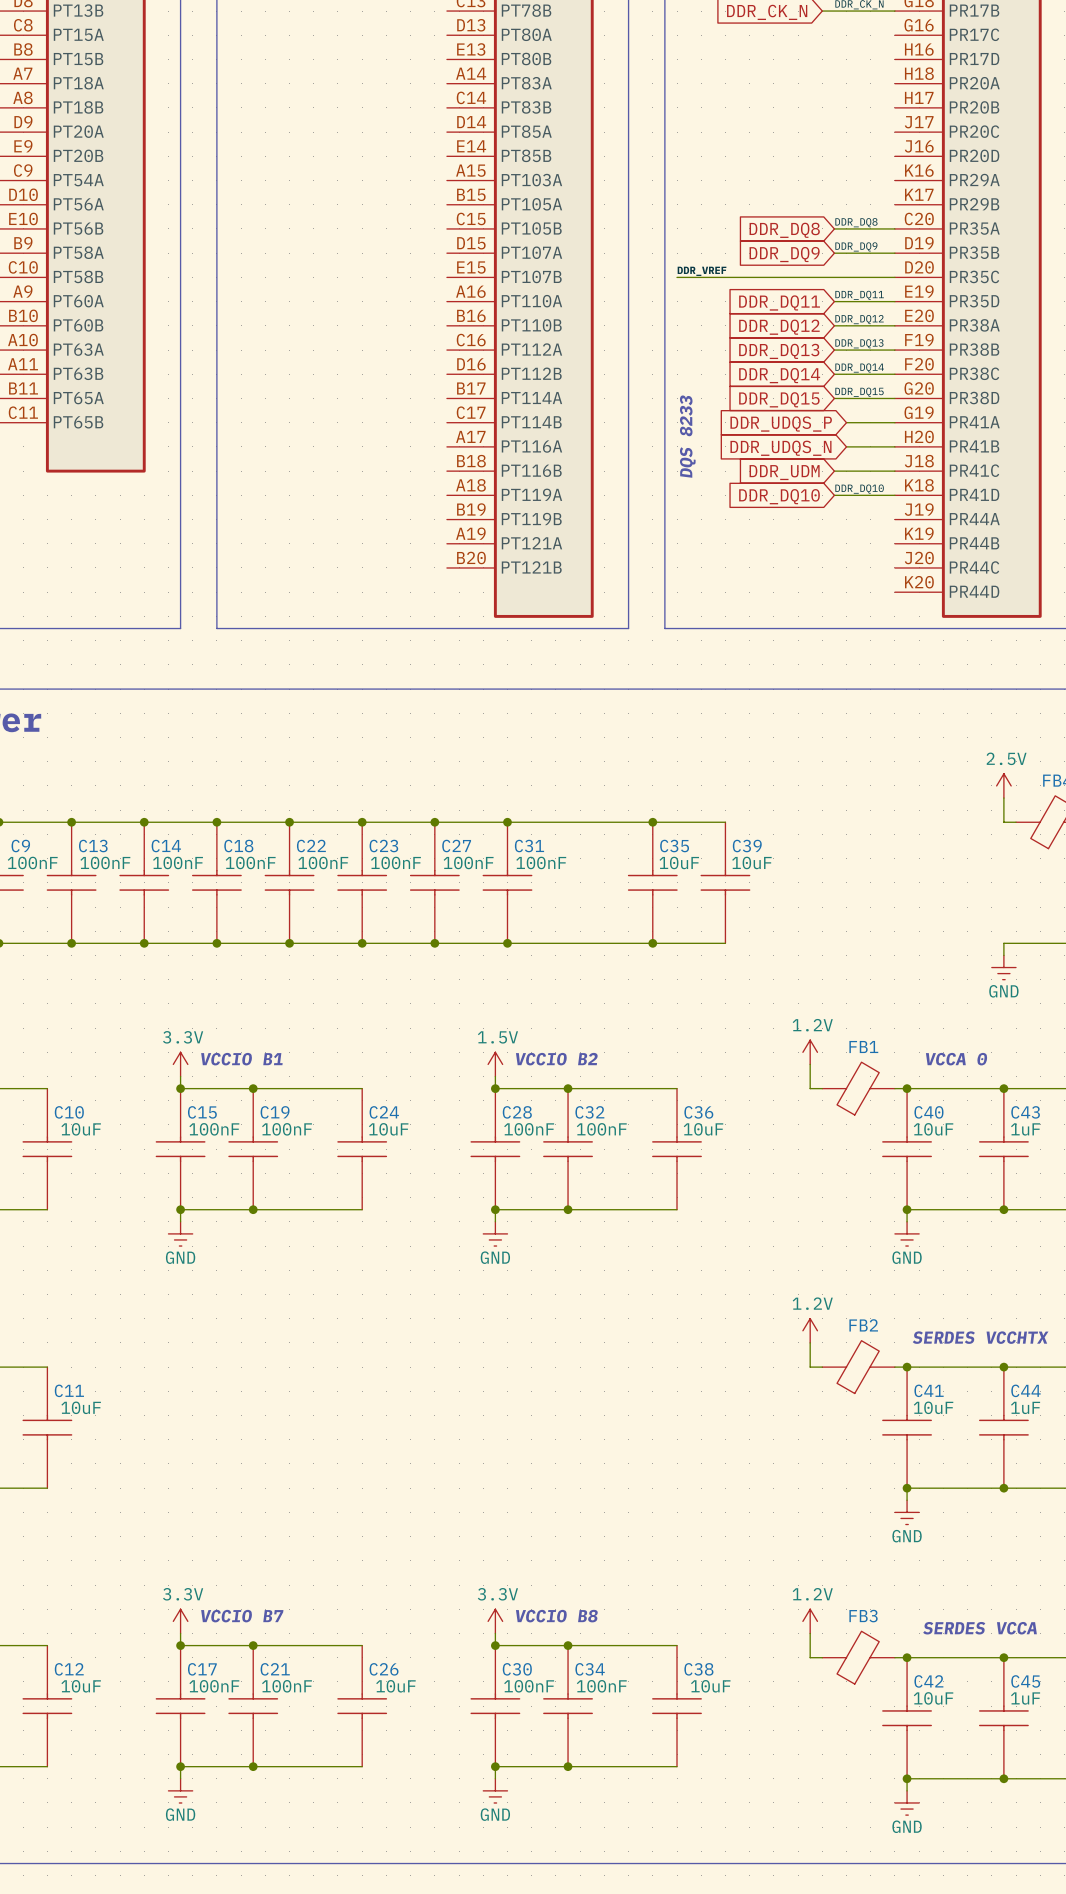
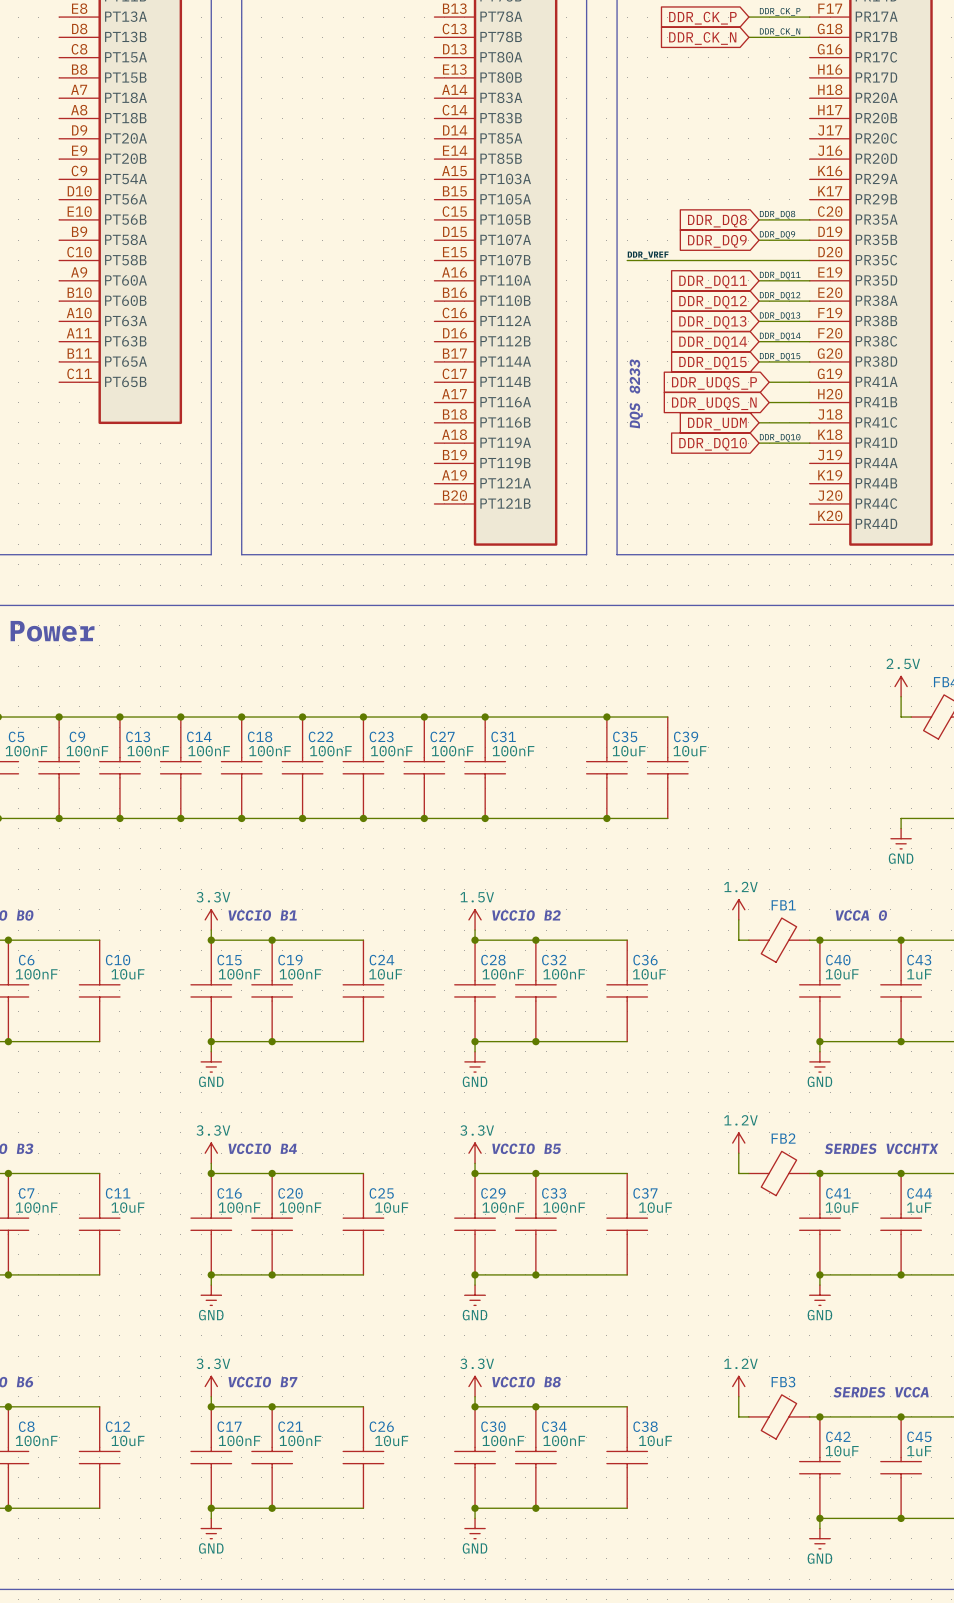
text: none -> VCCIO B4 (262, 1148)
text: none -> VCCIO B5 (526, 1148)
power symbol: none -> 3.3V (211, 1153)
power symbol: none -> 3.3V (475, 1153)
wire: none -> (211, 1163) (211, 1173) (363, 1173)
wire: none -> (475, 1163) (475, 1173) (627, 1173)
junction: none -> (211, 1173)
junction: none -> (272, 1173)
junction: none -> (475, 1173)
junction: none -> (535, 1173)
C16: none -> 100nF (211, 1224)
C20: none -> 100nF (272, 1224)
C25: none -> 10uF (363, 1224)
C29: none -> 100nF (475, 1224)
C33: none -> 100nF (535, 1224)
C37: none -> 10uF (627, 1224)
junction: none -> (211, 1274)
junction: none -> (272, 1274)
wire: none -> (363, 1274) (211, 1274) (211, 1285)
junction: none -> (475, 1274)
junction: none -> (535, 1274)
wire: none -> (627, 1274) (475, 1274) (475, 1285)
power symbol: none -> GND (211, 1295)
power symbol: none -> GND (475, 1295)

